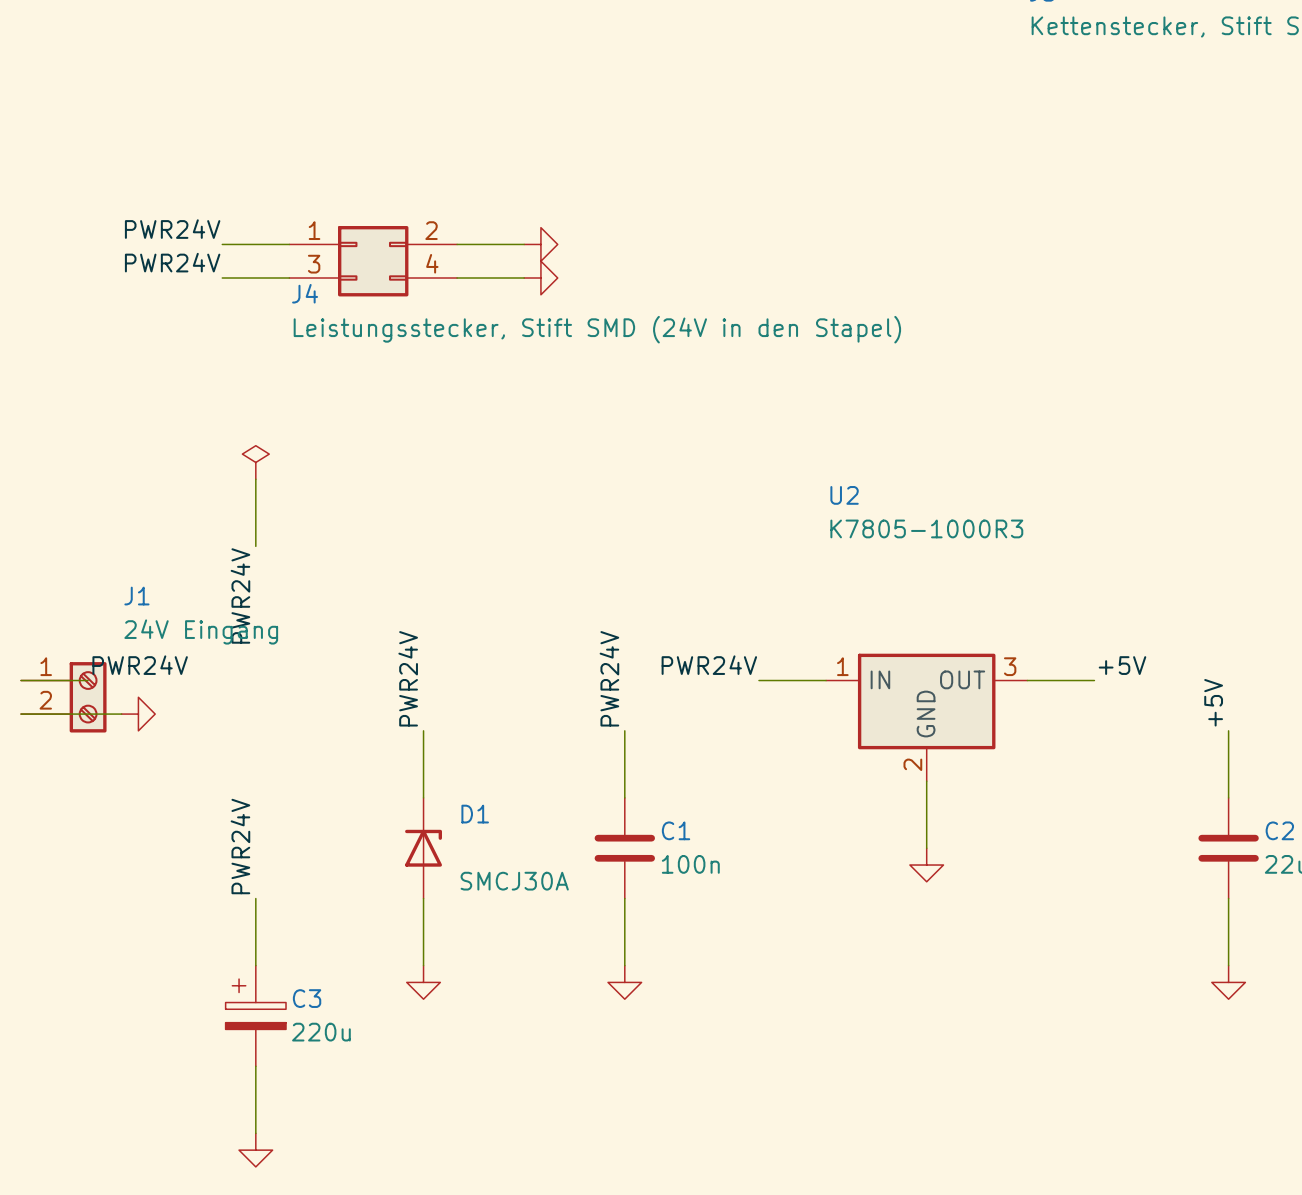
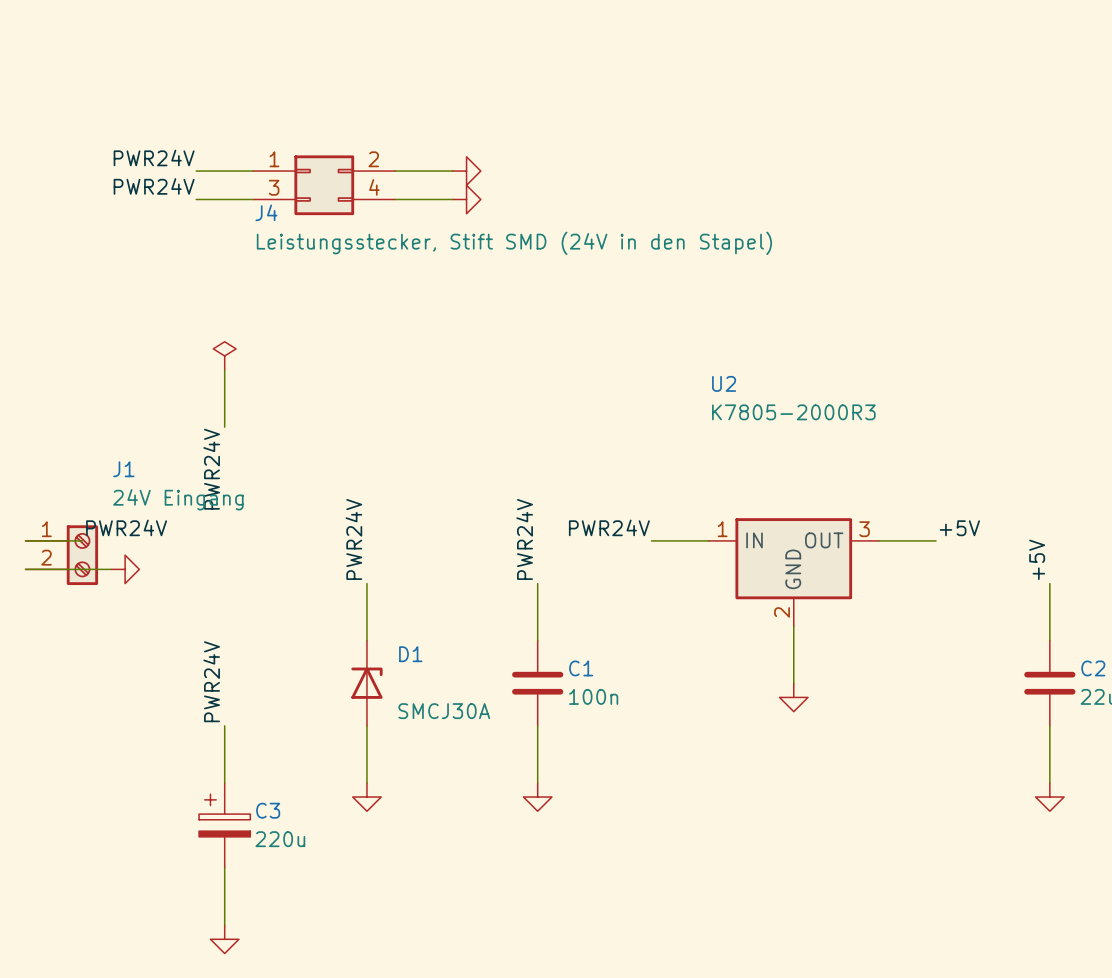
U2 value: K7805-1000R3 (926, 528) -> K7805-2000R3 (793, 412)

